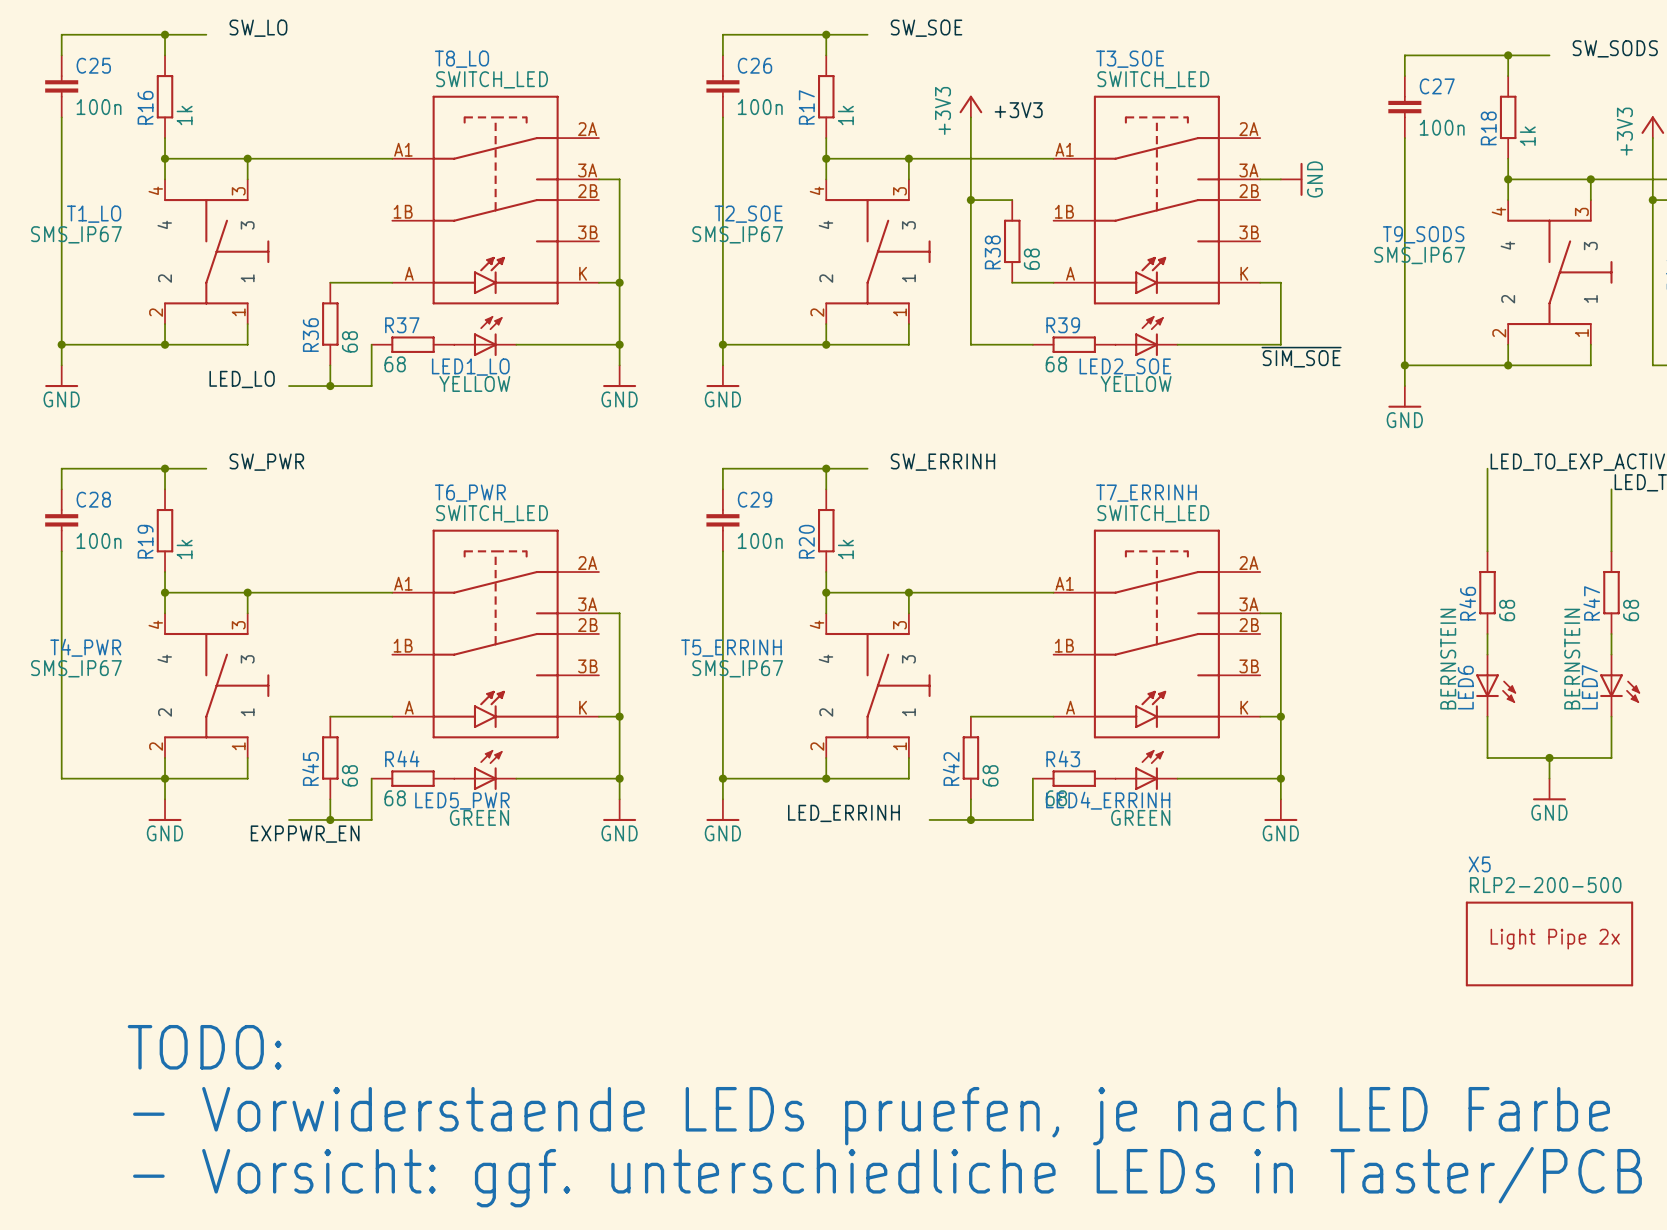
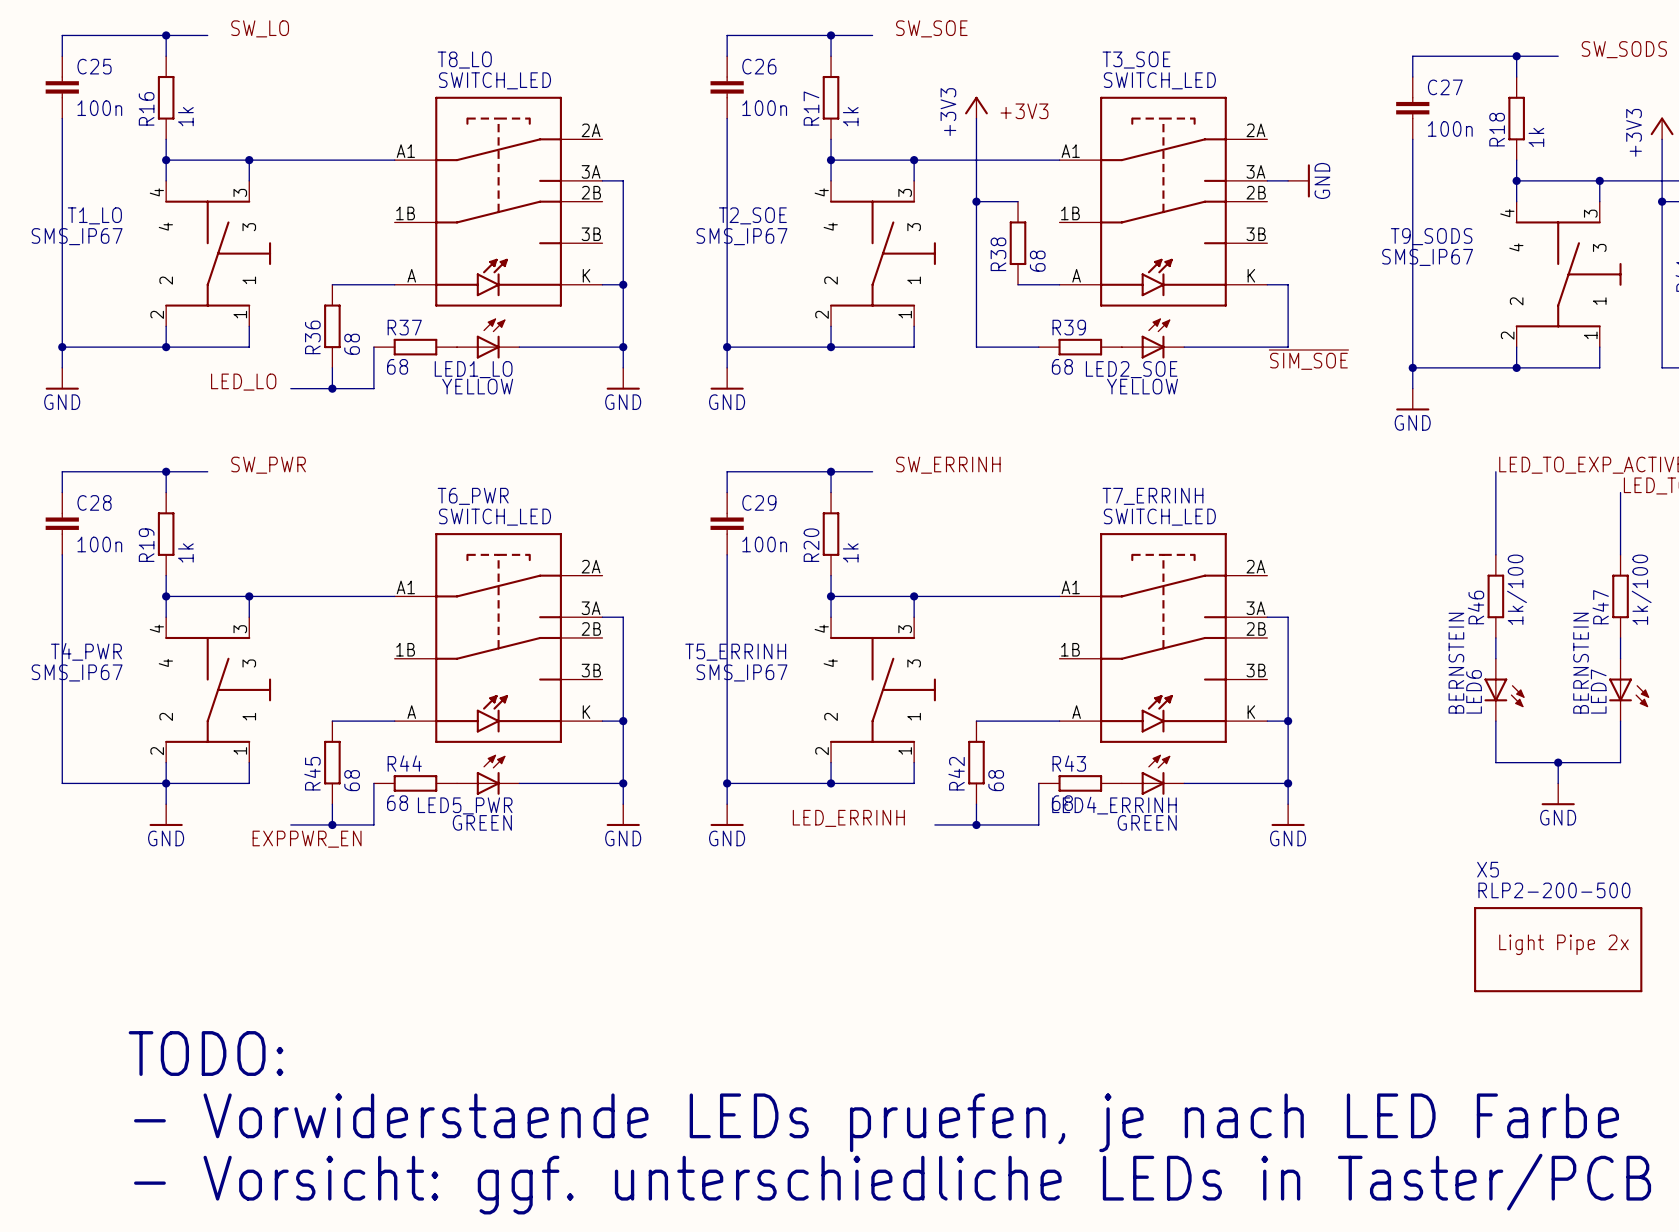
R46 value: 68 (1507, 610) -> 1k/100 (1517, 589)
R47 value: 68 (1631, 610) -> 1k/100 (1641, 589)

